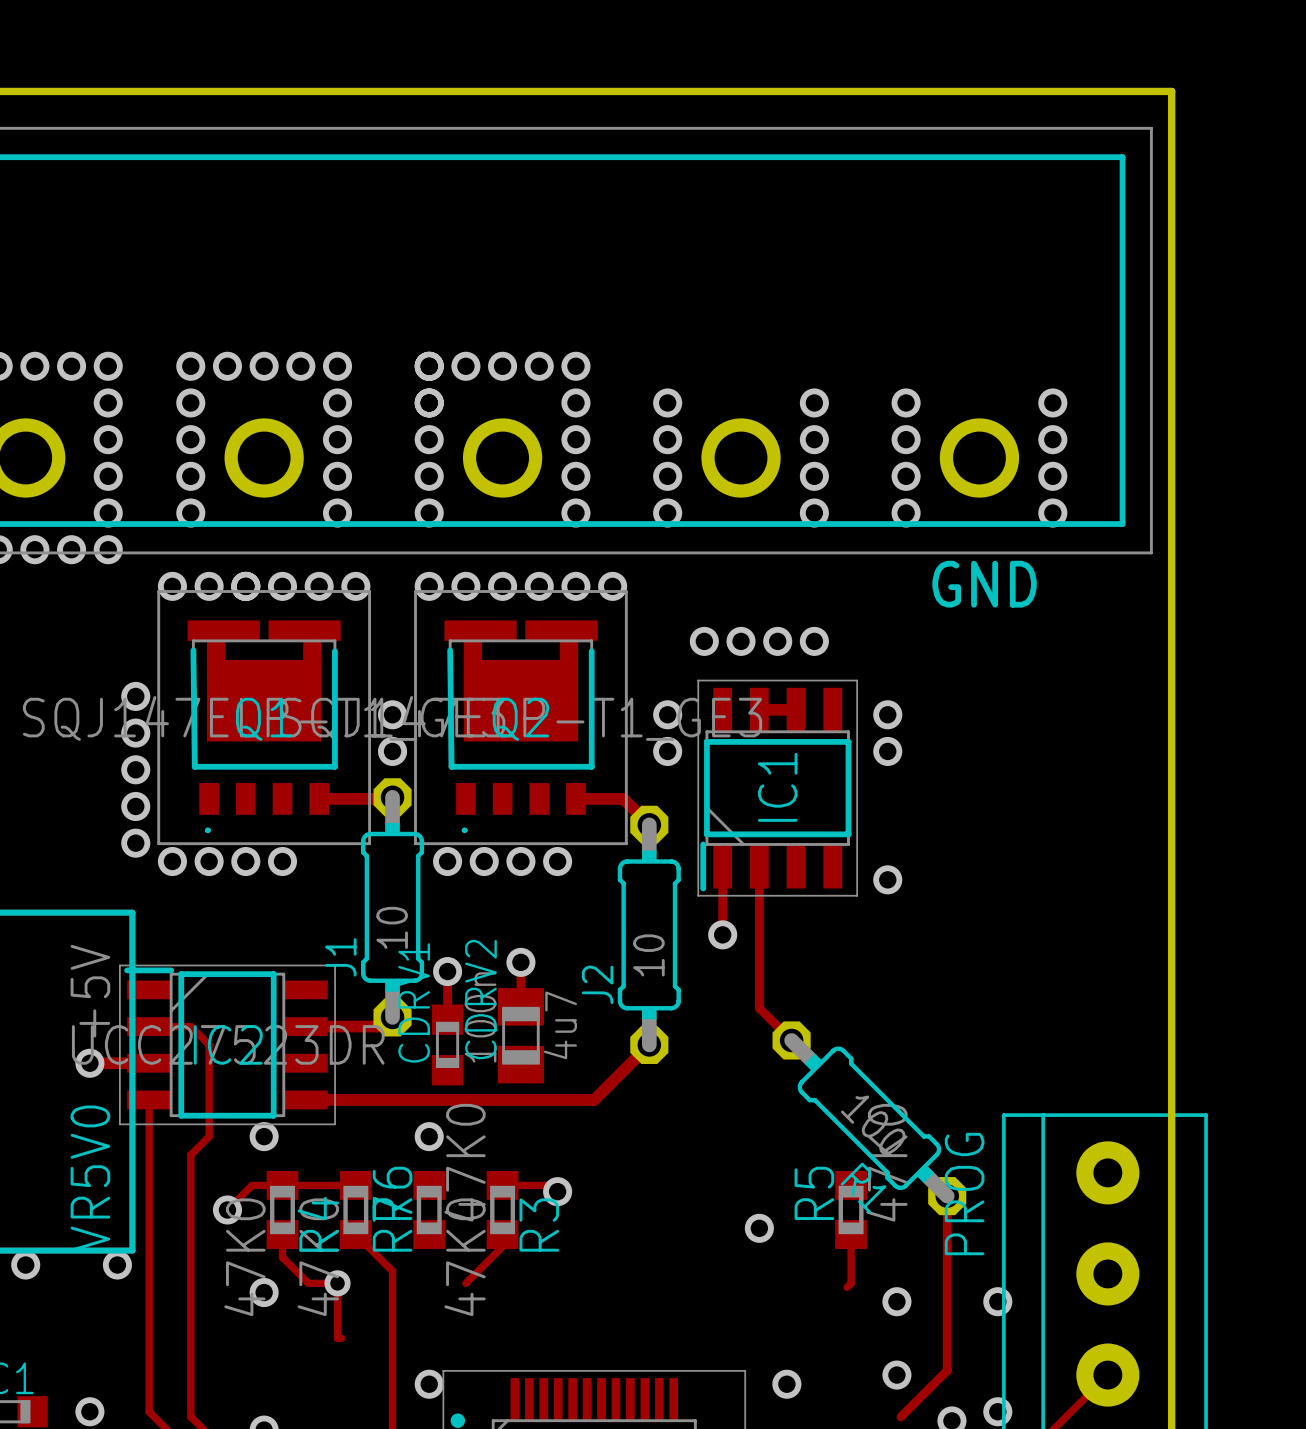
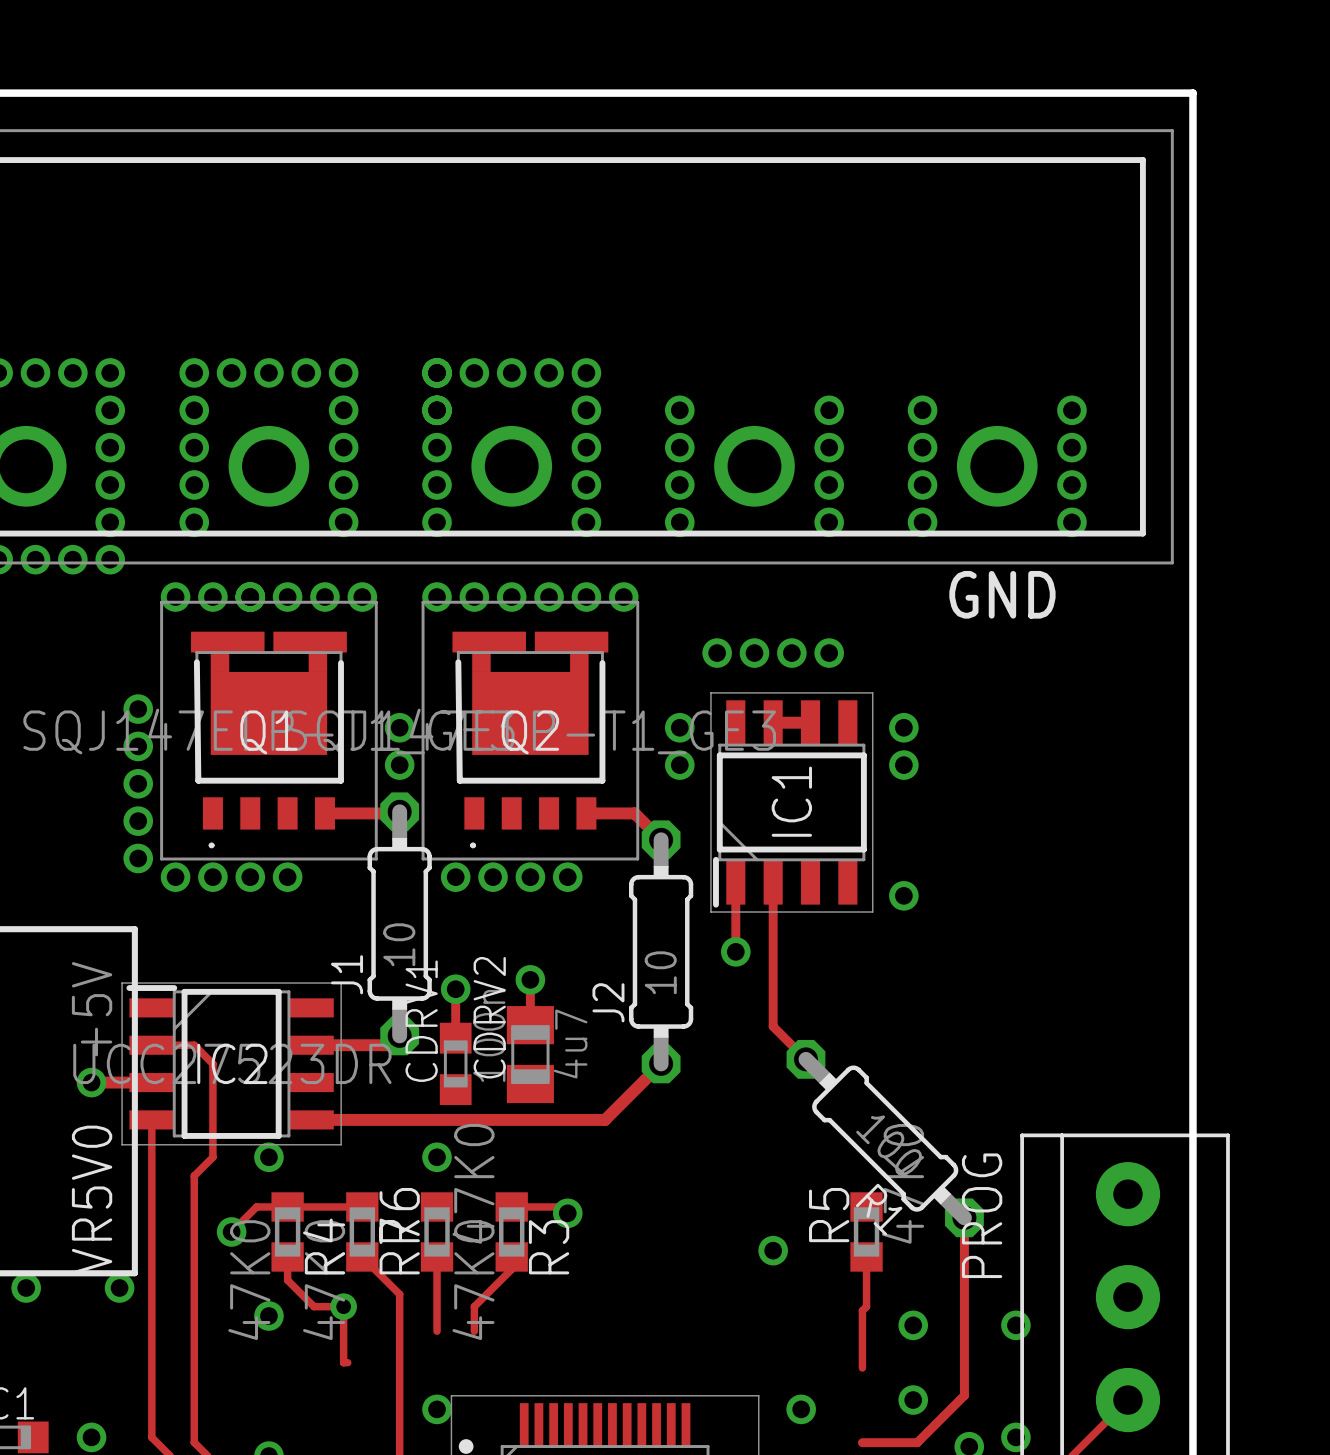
track: none -> (437, 1256) (437, 1331)
track: none -> (474, 1306) (474, 1331)
track: none -> (862, 1310) (862, 1367)
track: none -> (862, 1442) (917, 1442)

